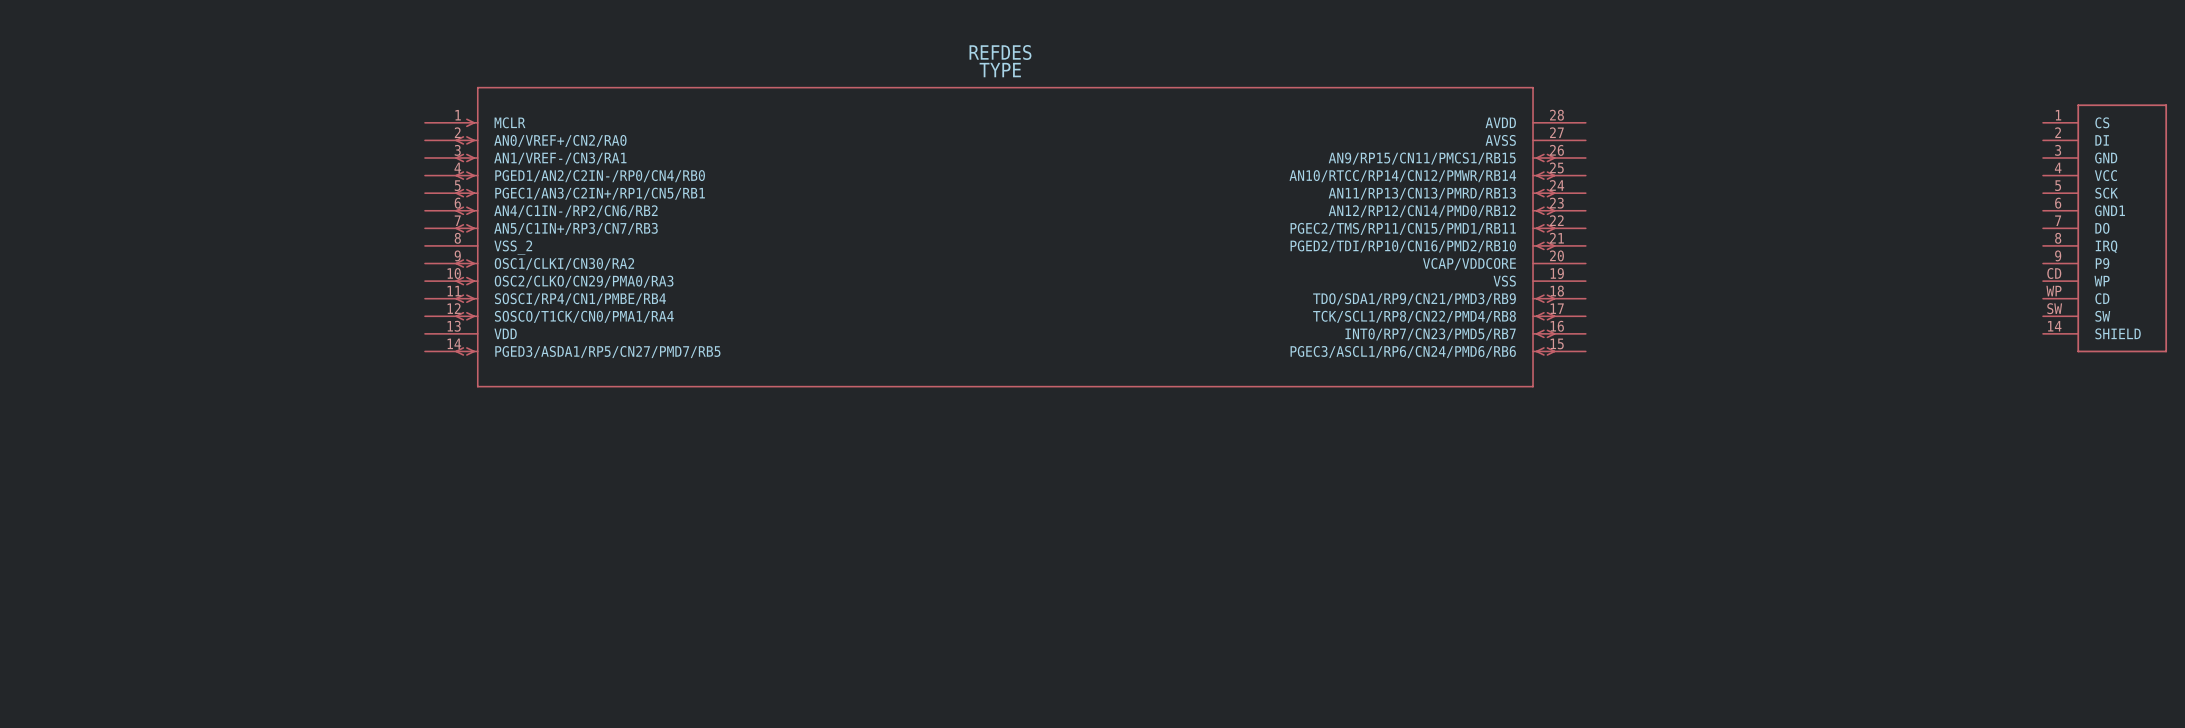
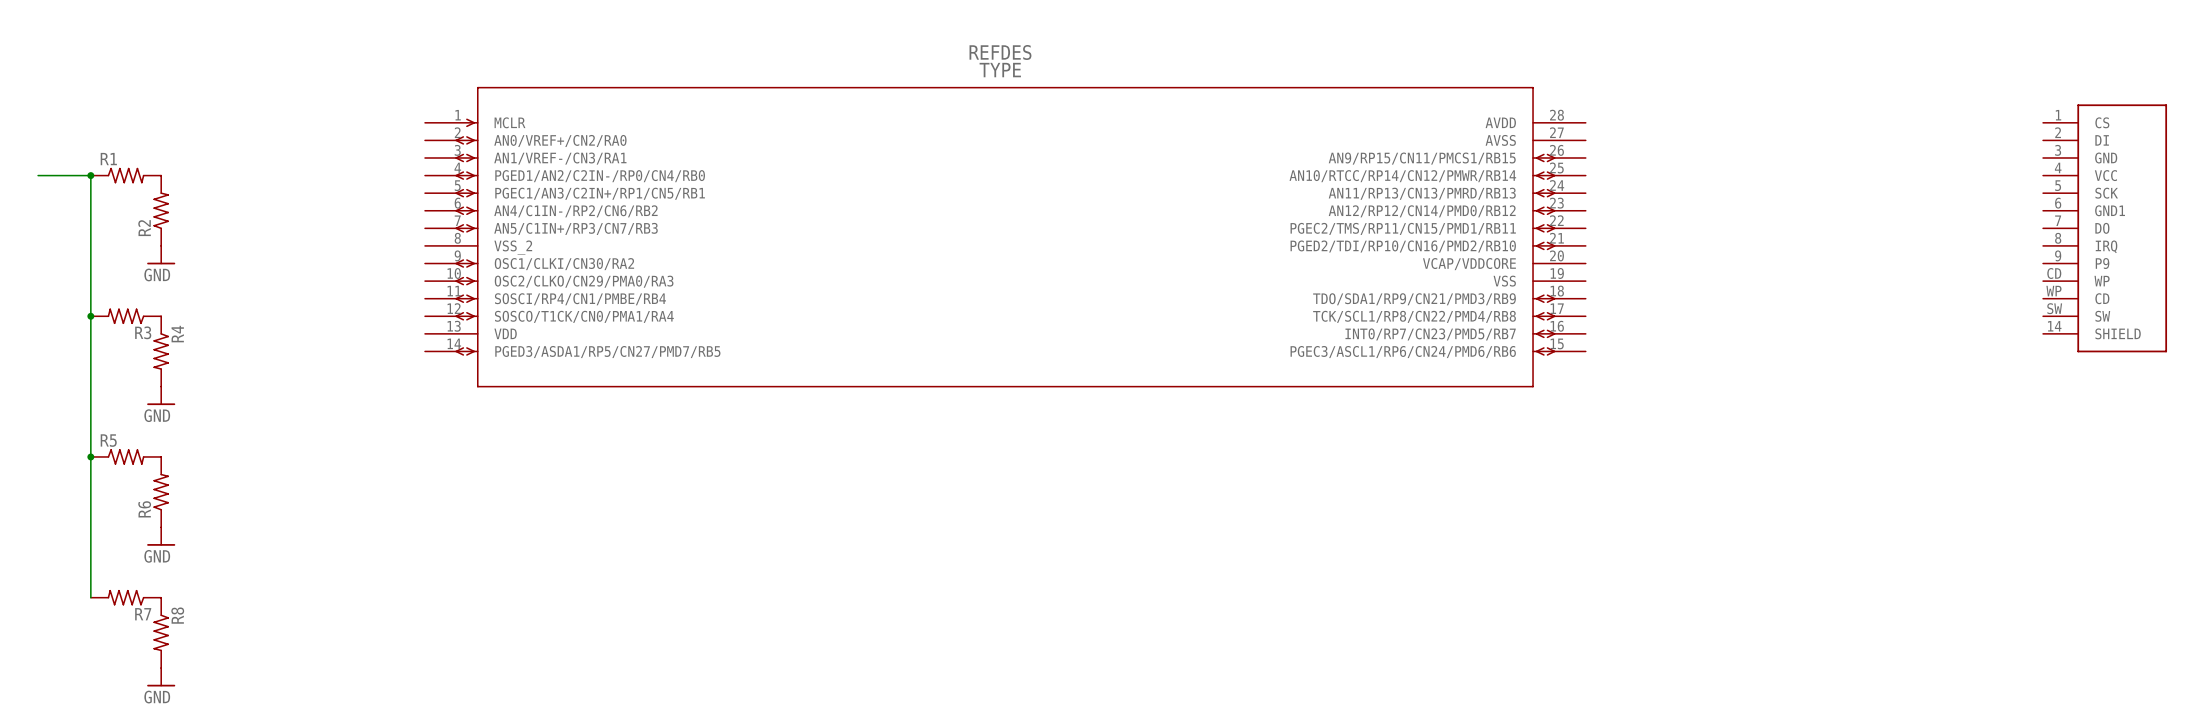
wire: none -> (38, 175) (90, 175) (90, 597)
junction: none -> (90, 175)
R1: none -> (126, 175)
R2: none -> (161, 210)
power symbol: none -> GND (161, 255)
junction: none -> (90, 316)
R3: none -> (126, 316)
R4: none -> (161, 351)
power symbol: none -> GND (161, 395)
junction: none -> (90, 456)
R5: none -> (126, 456)
R6: none -> (161, 492)
power symbol: none -> GND (161, 536)
R7: none -> (126, 597)
R8: none -> (161, 632)
power symbol: none -> GND (161, 677)

